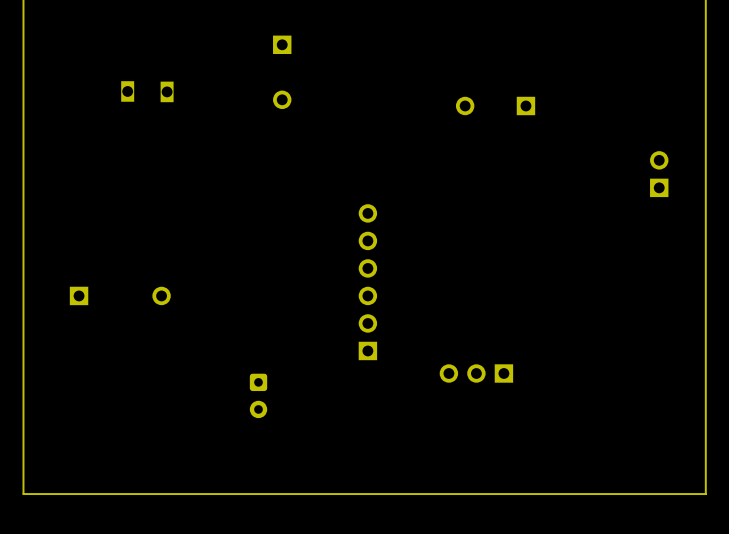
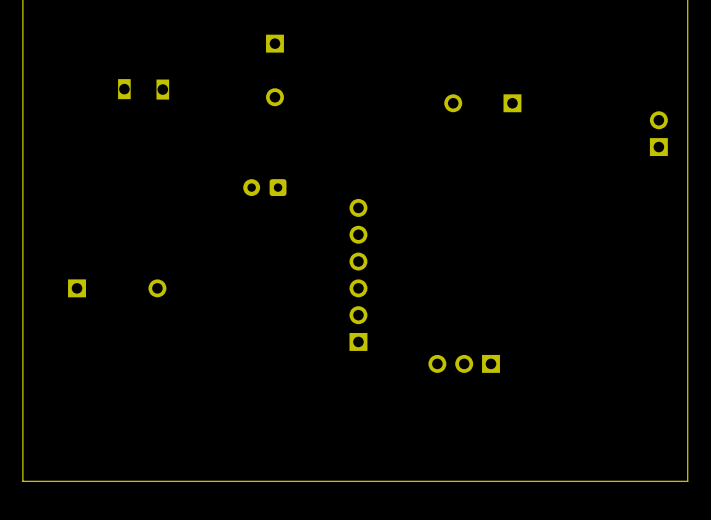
part position: (659, 174) -> (658, 133)
part rotation: 0° (258, 395) -> 90° clockwise (264, 187)
part position: (258, 395) -> (264, 187)

